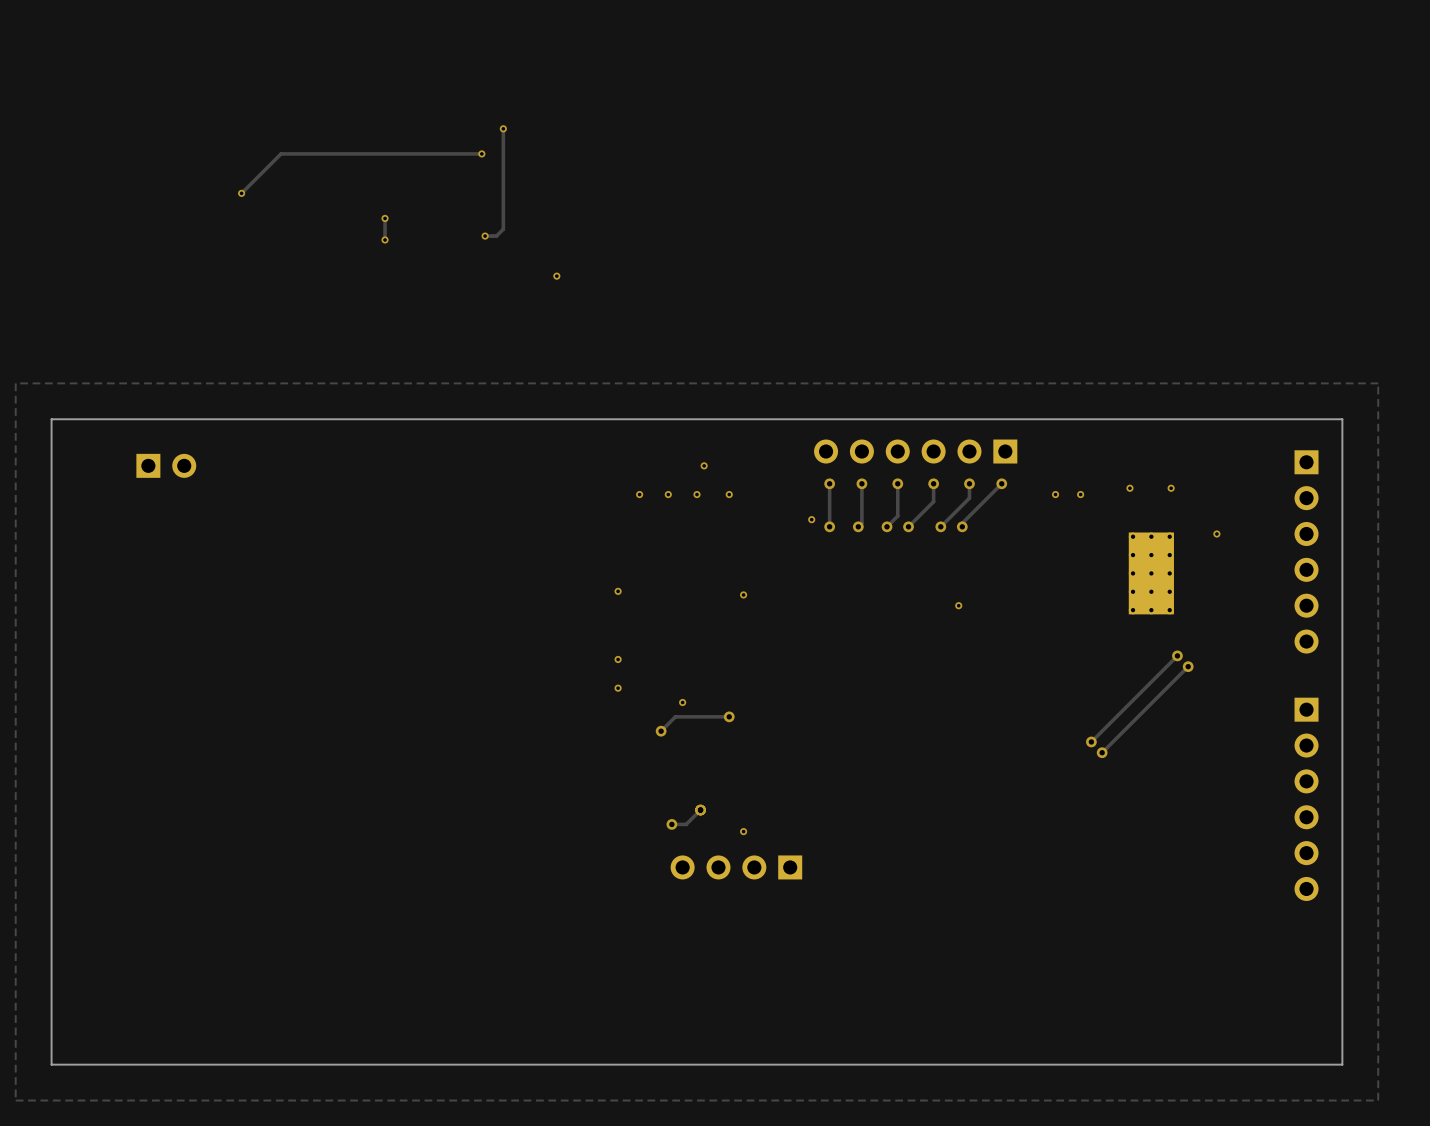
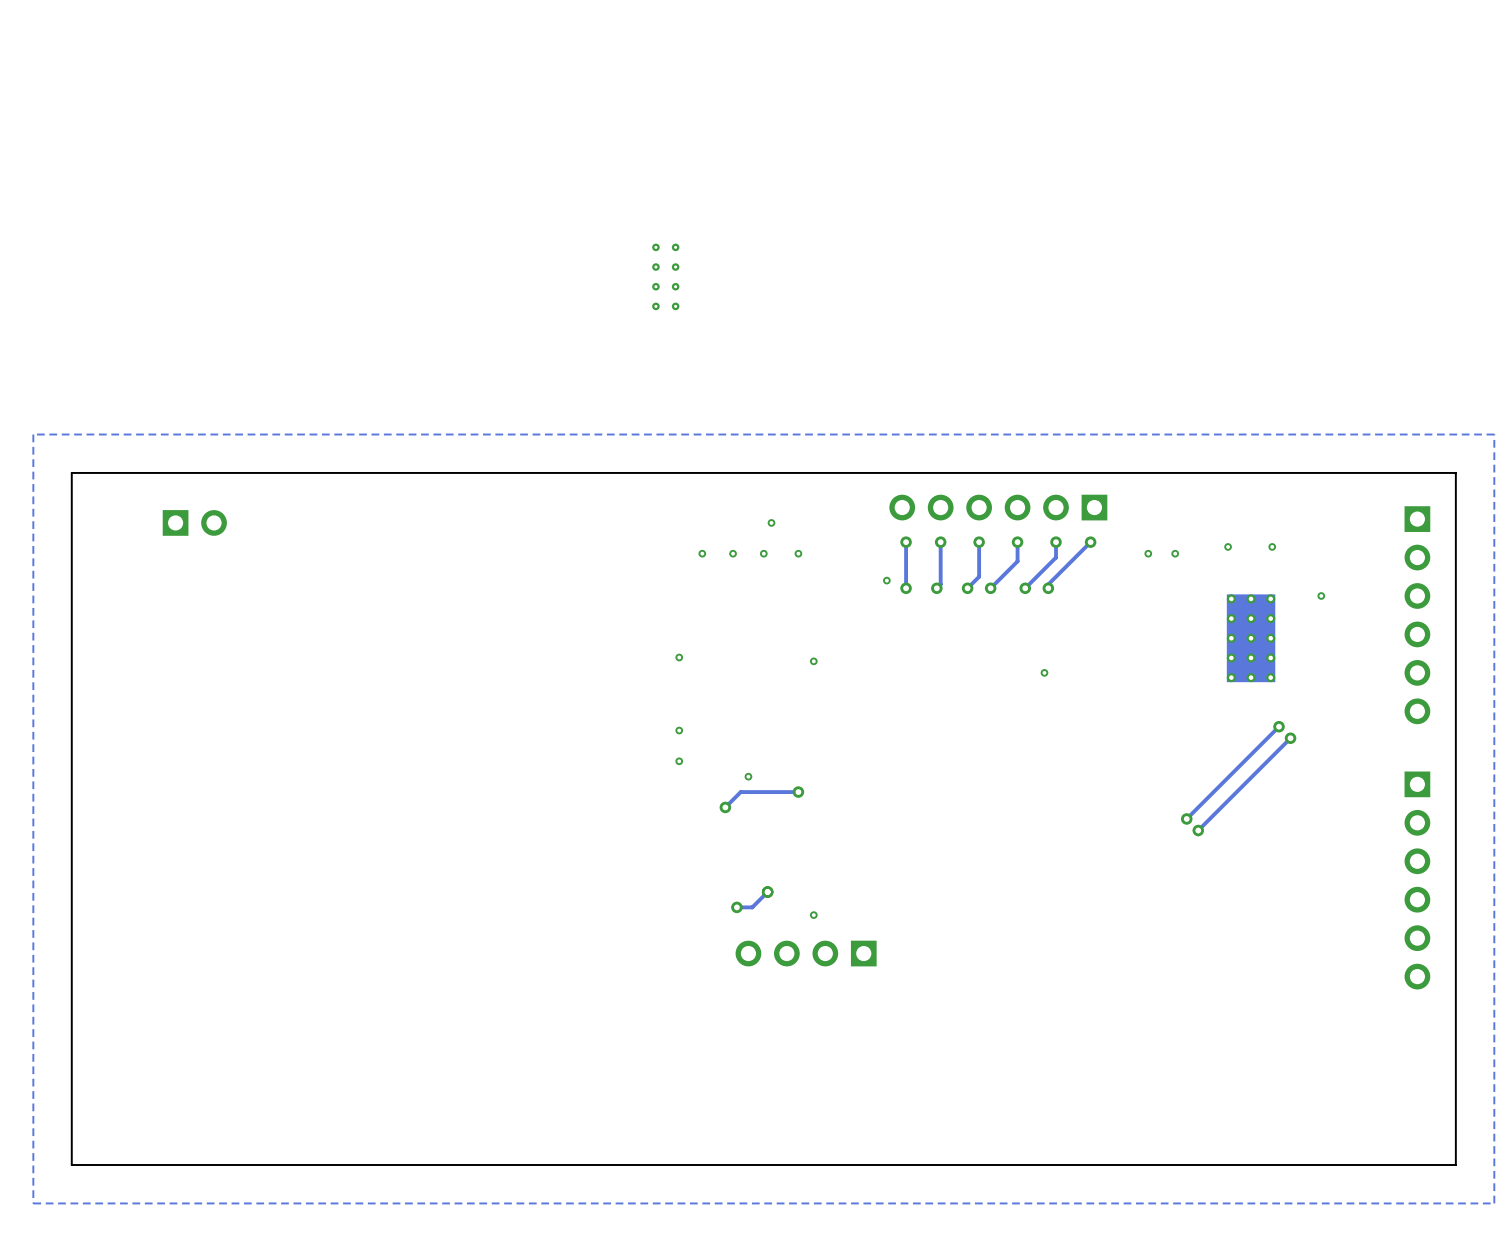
track: (503, 128) (503, 229) (496, 236) (485, 236) -> none
via: (503, 128) -> none
track: (481, 153) (281, 153) (241, 193) -> none
via: (481, 153) -> none
via: (241, 193) -> none
track: (385, 218) (385, 239) -> none
via: (385, 218) -> none
via: (485, 236) -> none
part: none -> (665, 276)
via: (385, 239) -> none
via: (556, 276) -> none

